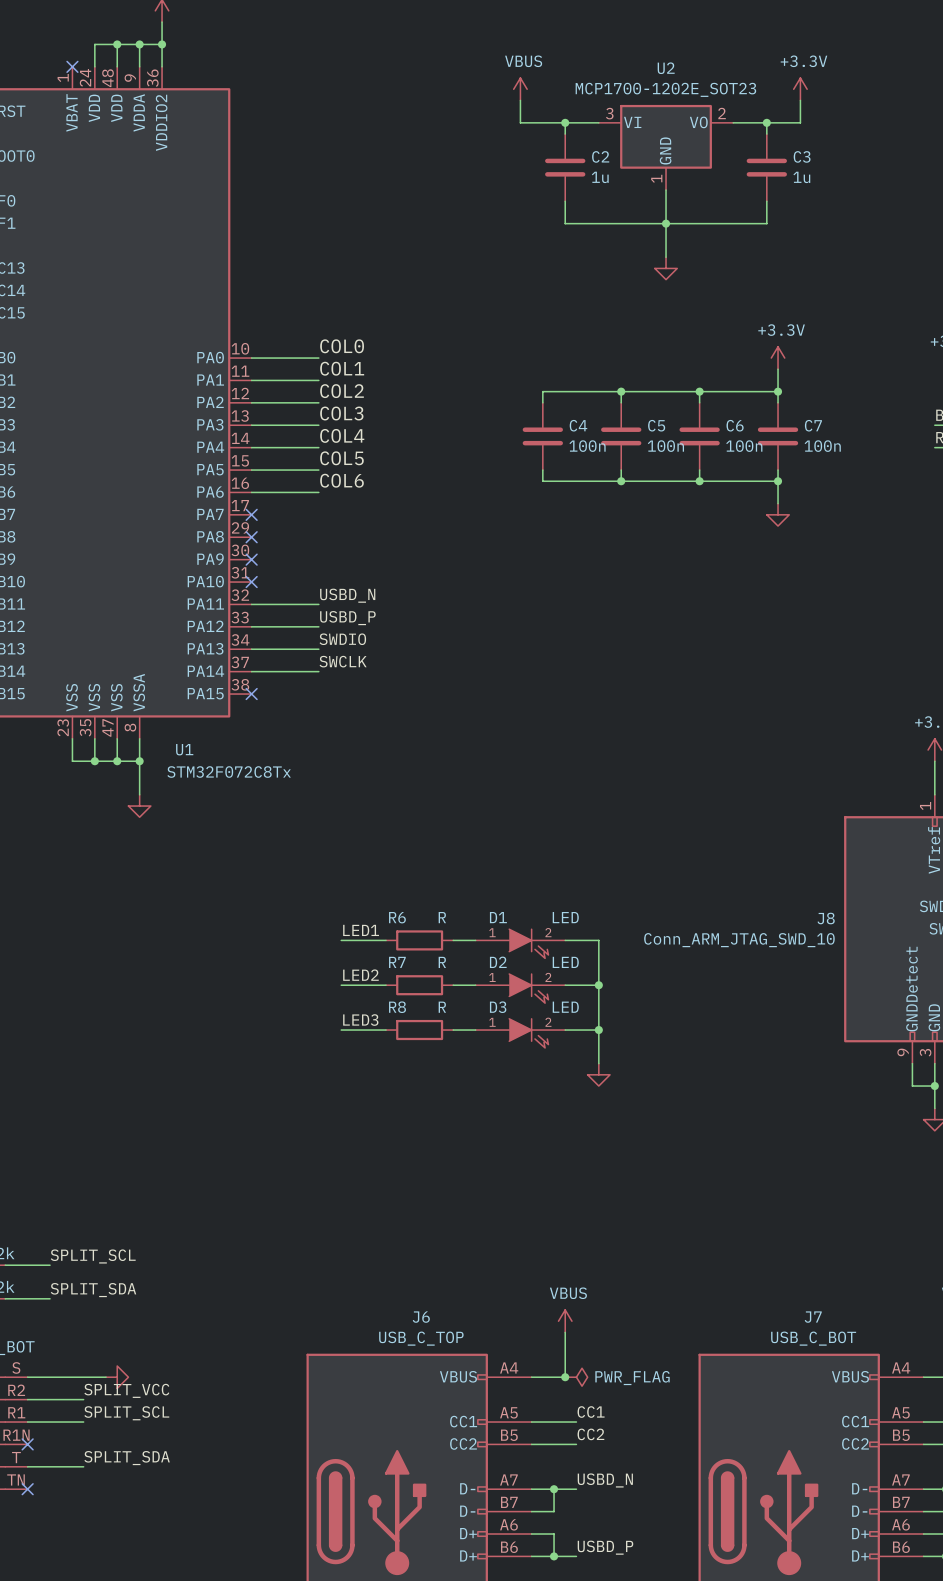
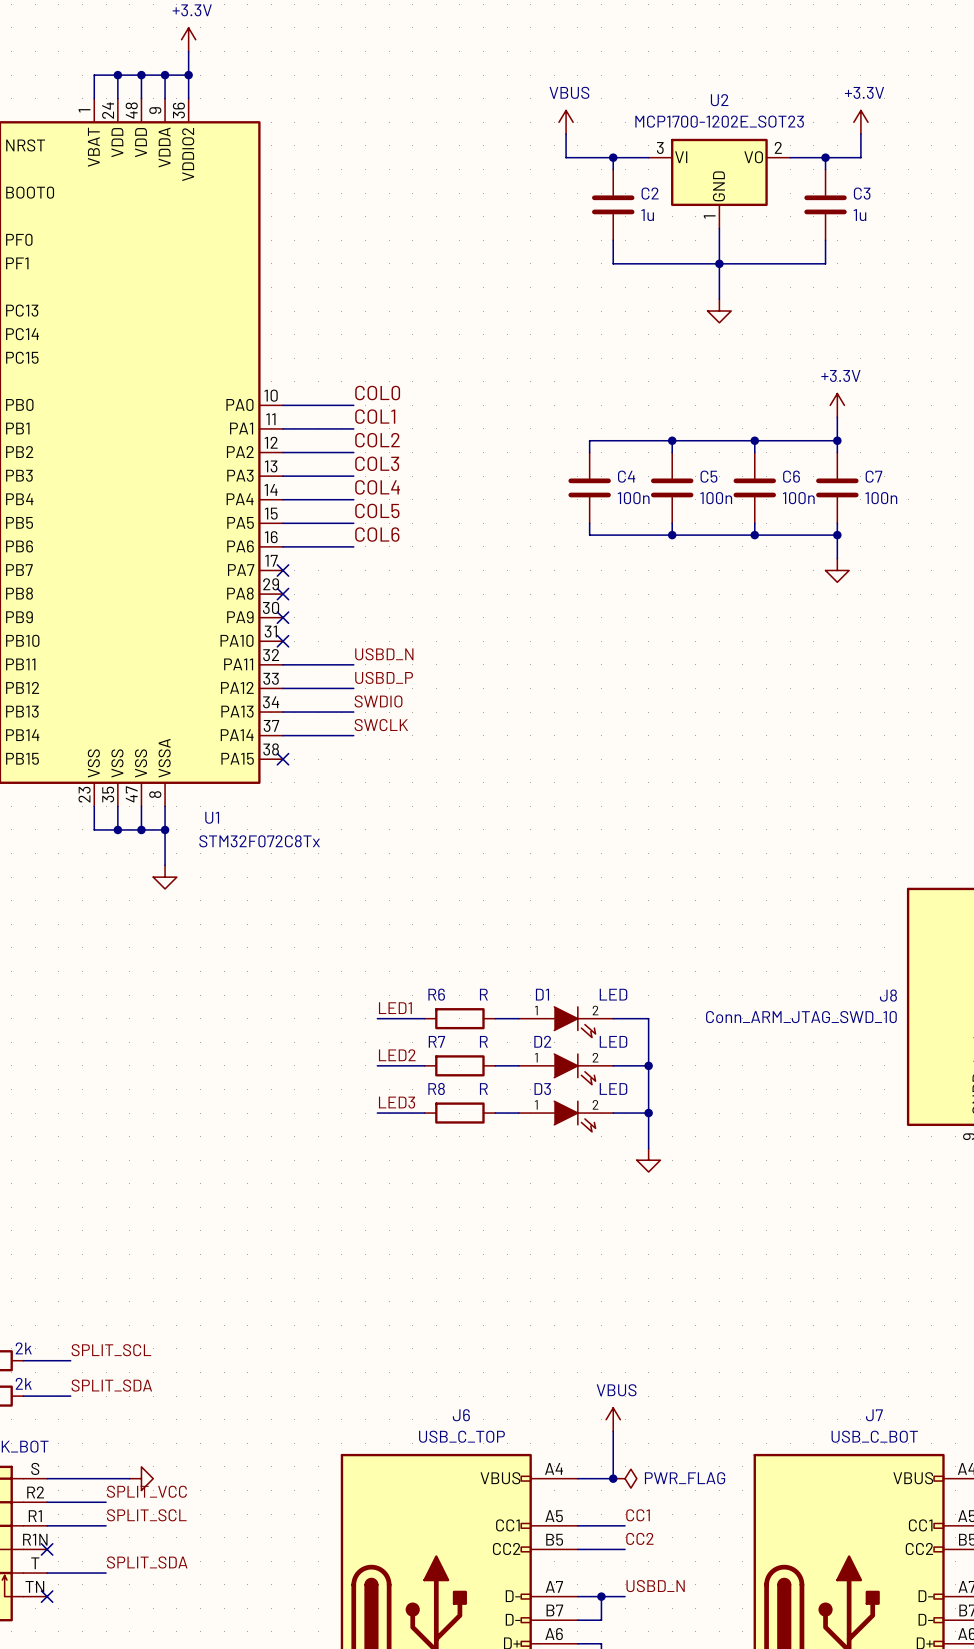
wire: none -> (117, 75) (94, 75) (94, 98)
junction: none -> (117, 75)
no-connect mark: (72, 66) -> none

